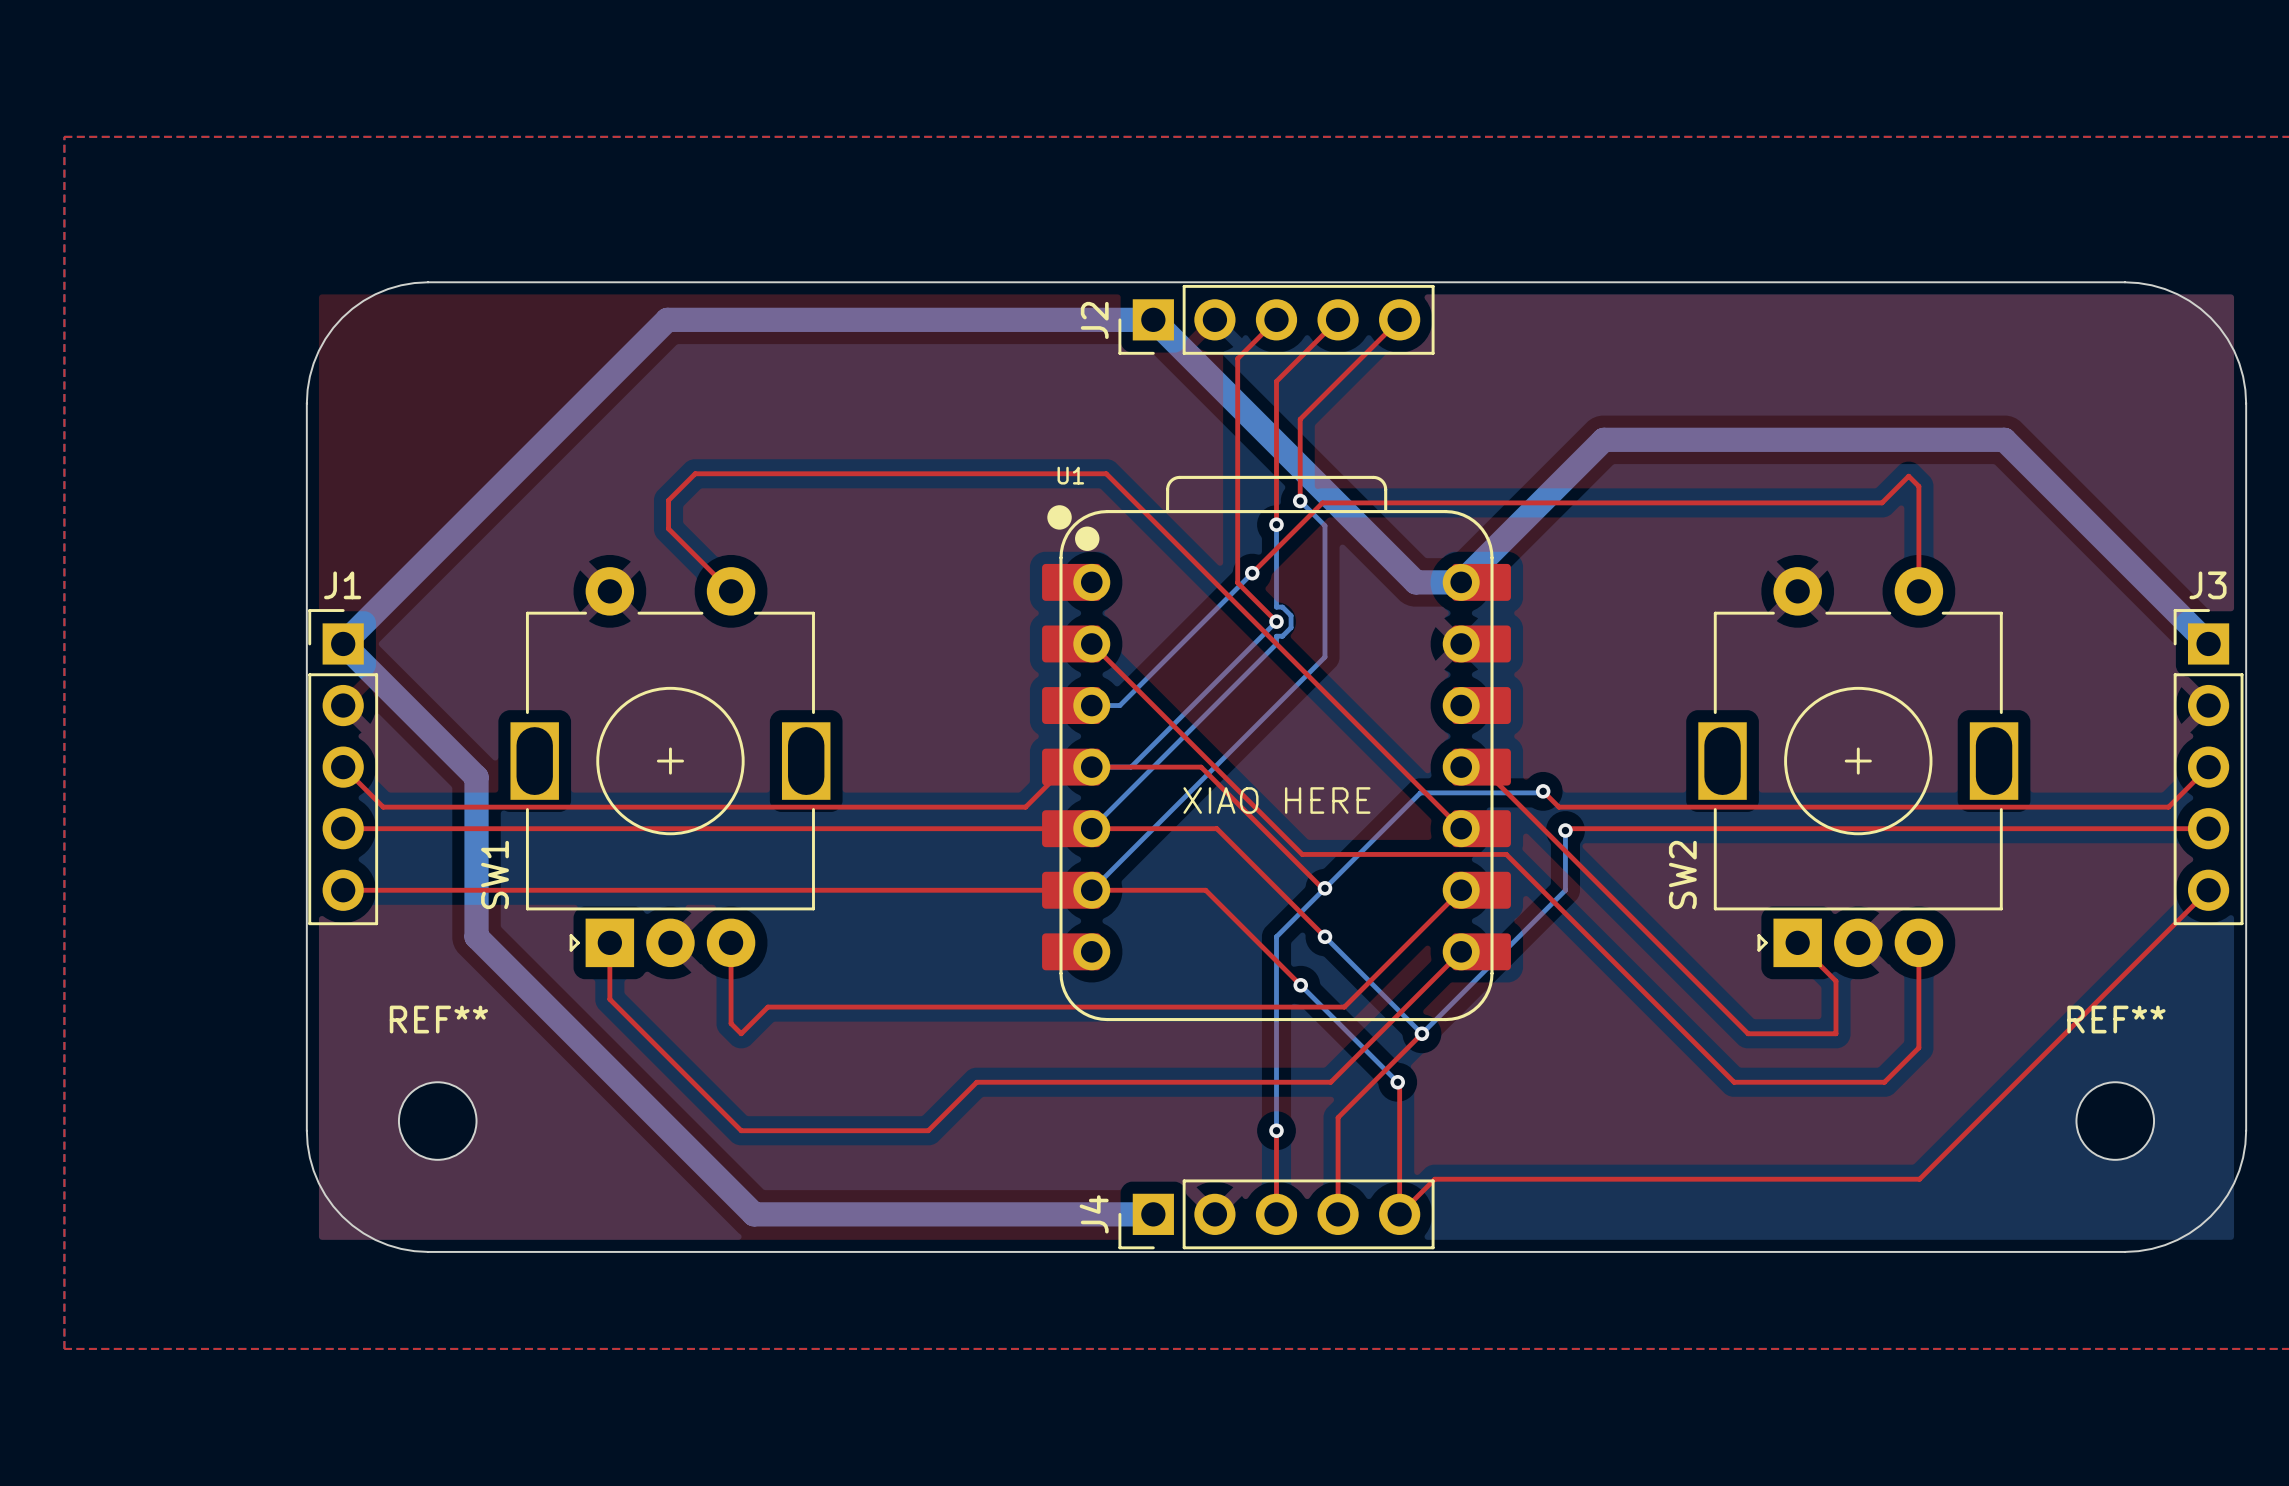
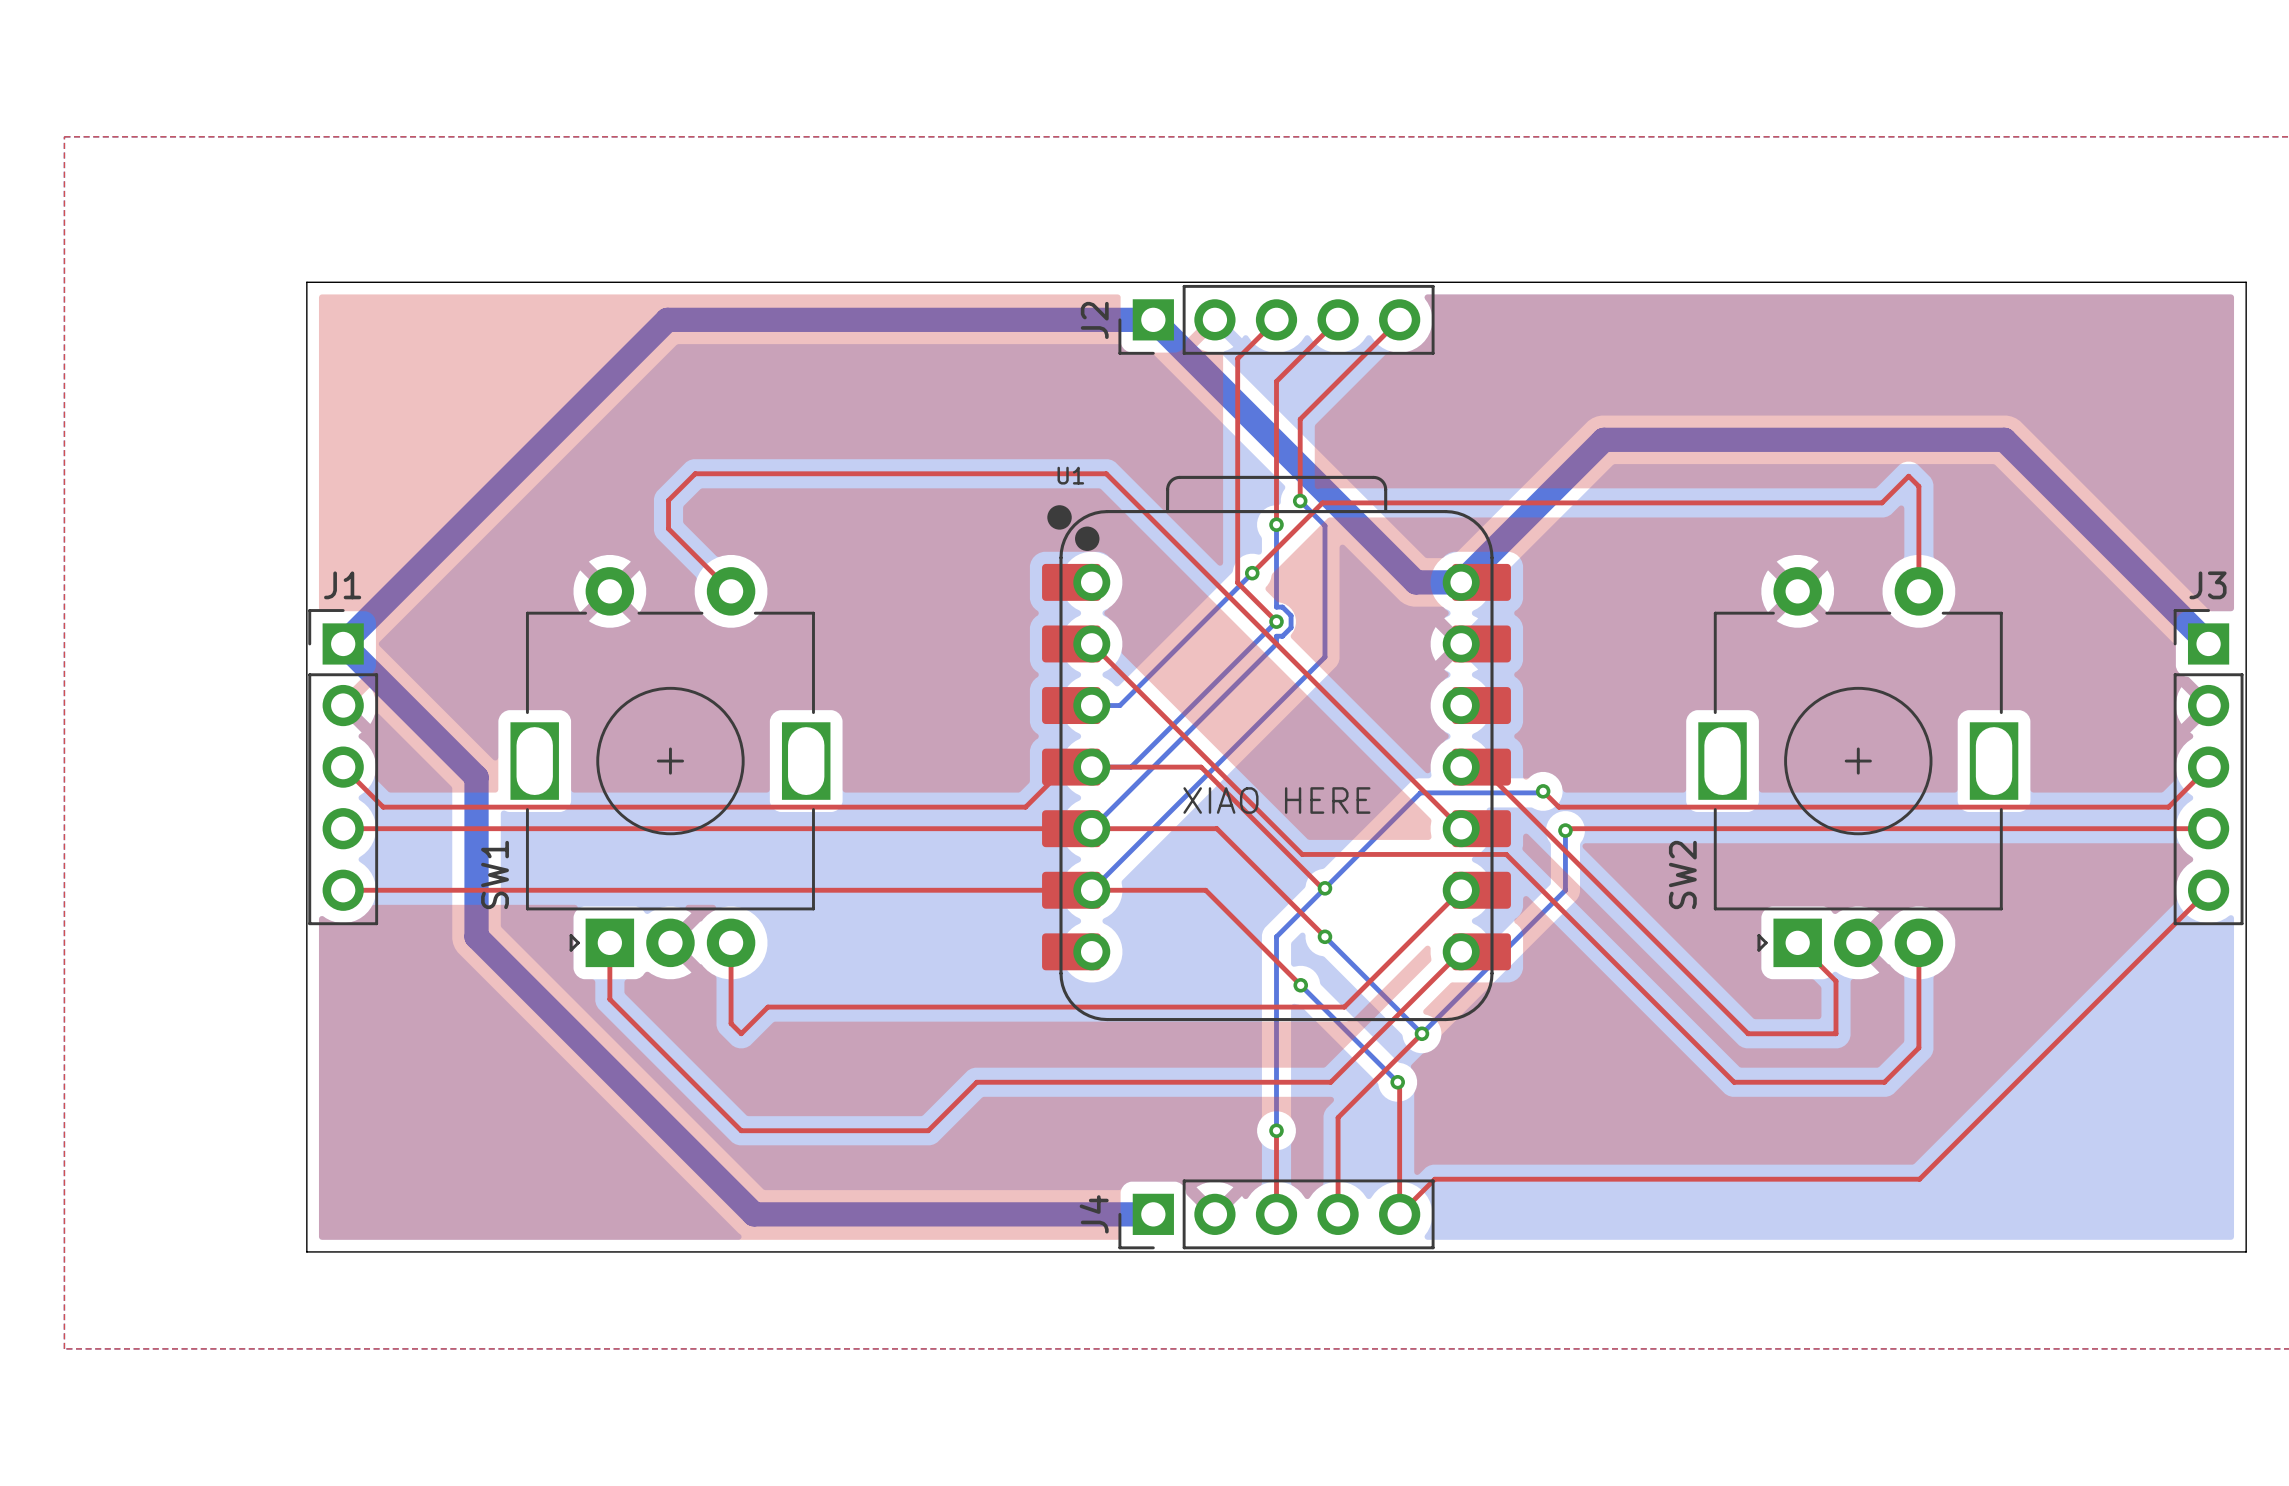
board edge: (428, 282) (414, 283) (388, 289) (363, 300) (342, 317) (333, 327) (318, 350) (309, 376) (306, 403) -> (428, 282) (306, 282) (306, 403)
board edge: (2124, 282) (2151, 285) (2164, 289) (2189, 300) (2210, 317) (2227, 339) (2239, 363) (2245, 389) (2246, 403) -> (2124, 282) (2246, 282) (2246, 403)
REF**: (437, 1121) -> none
REF**: (2115, 1121) -> none
board edge: (306, 1130) (309, 1157) (318, 1183) (333, 1206) (342, 1216) (363, 1233) (388, 1245) (401, 1248) (428, 1251) -> (306, 1130) (306, 1251) (428, 1251)
board edge: (2246, 1130) (2243, 1157) (2234, 1183) (2227, 1195) (2210, 1216) (2189, 1233) (2177, 1239) (2151, 1248) (2124, 1251) -> (2246, 1130) (2246, 1251) (2124, 1251)

